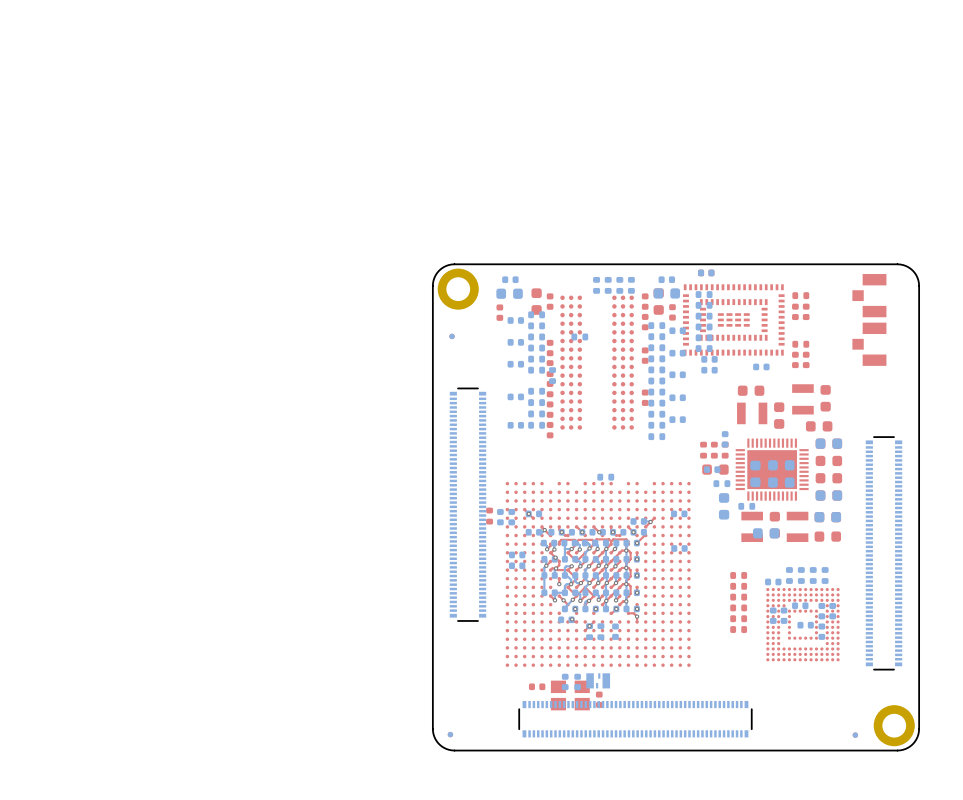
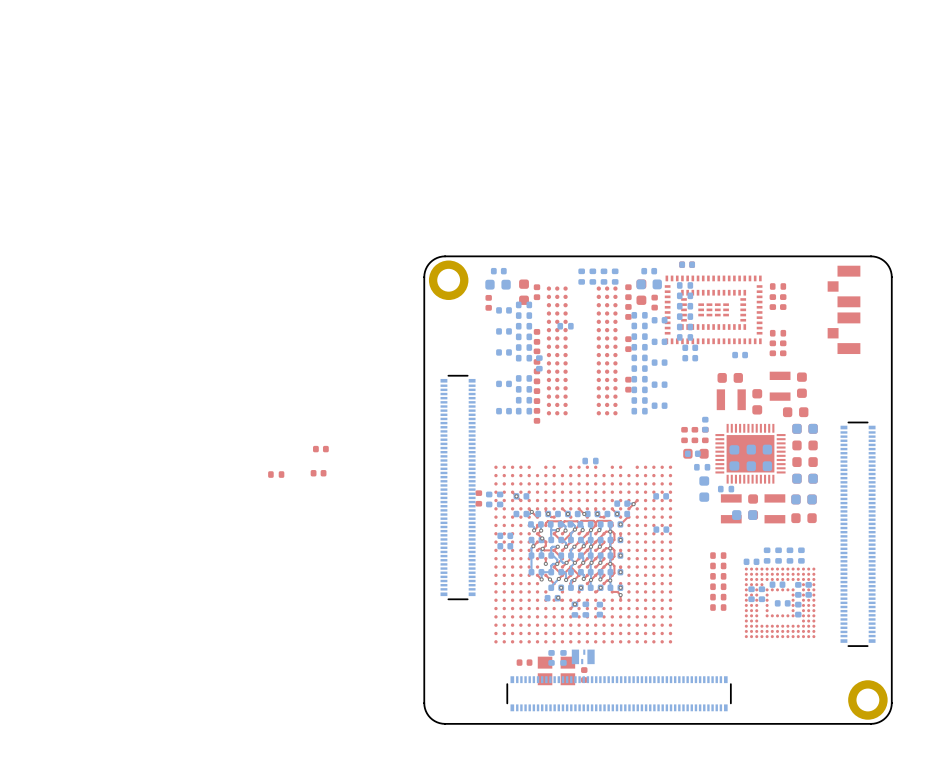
part: (452, 336) -> none
part: (656, 436) -> none
part: none -> (320, 449)
part: none -> (318, 473)
part: none -> (276, 474)
part: (450, 734) -> none
part: (855, 735) -> none

